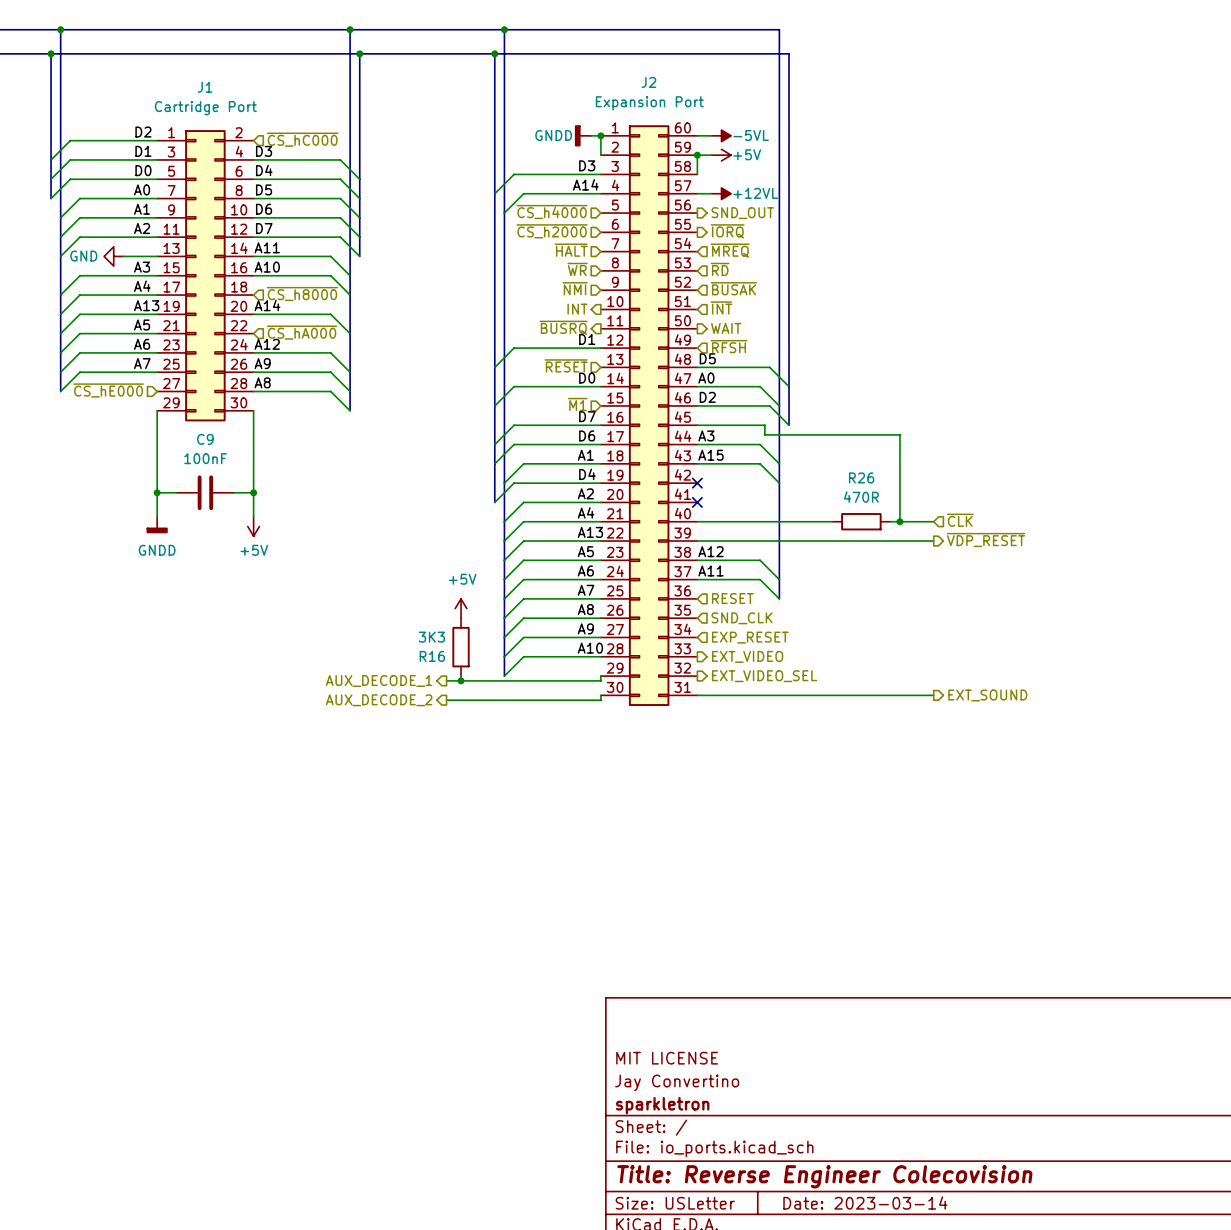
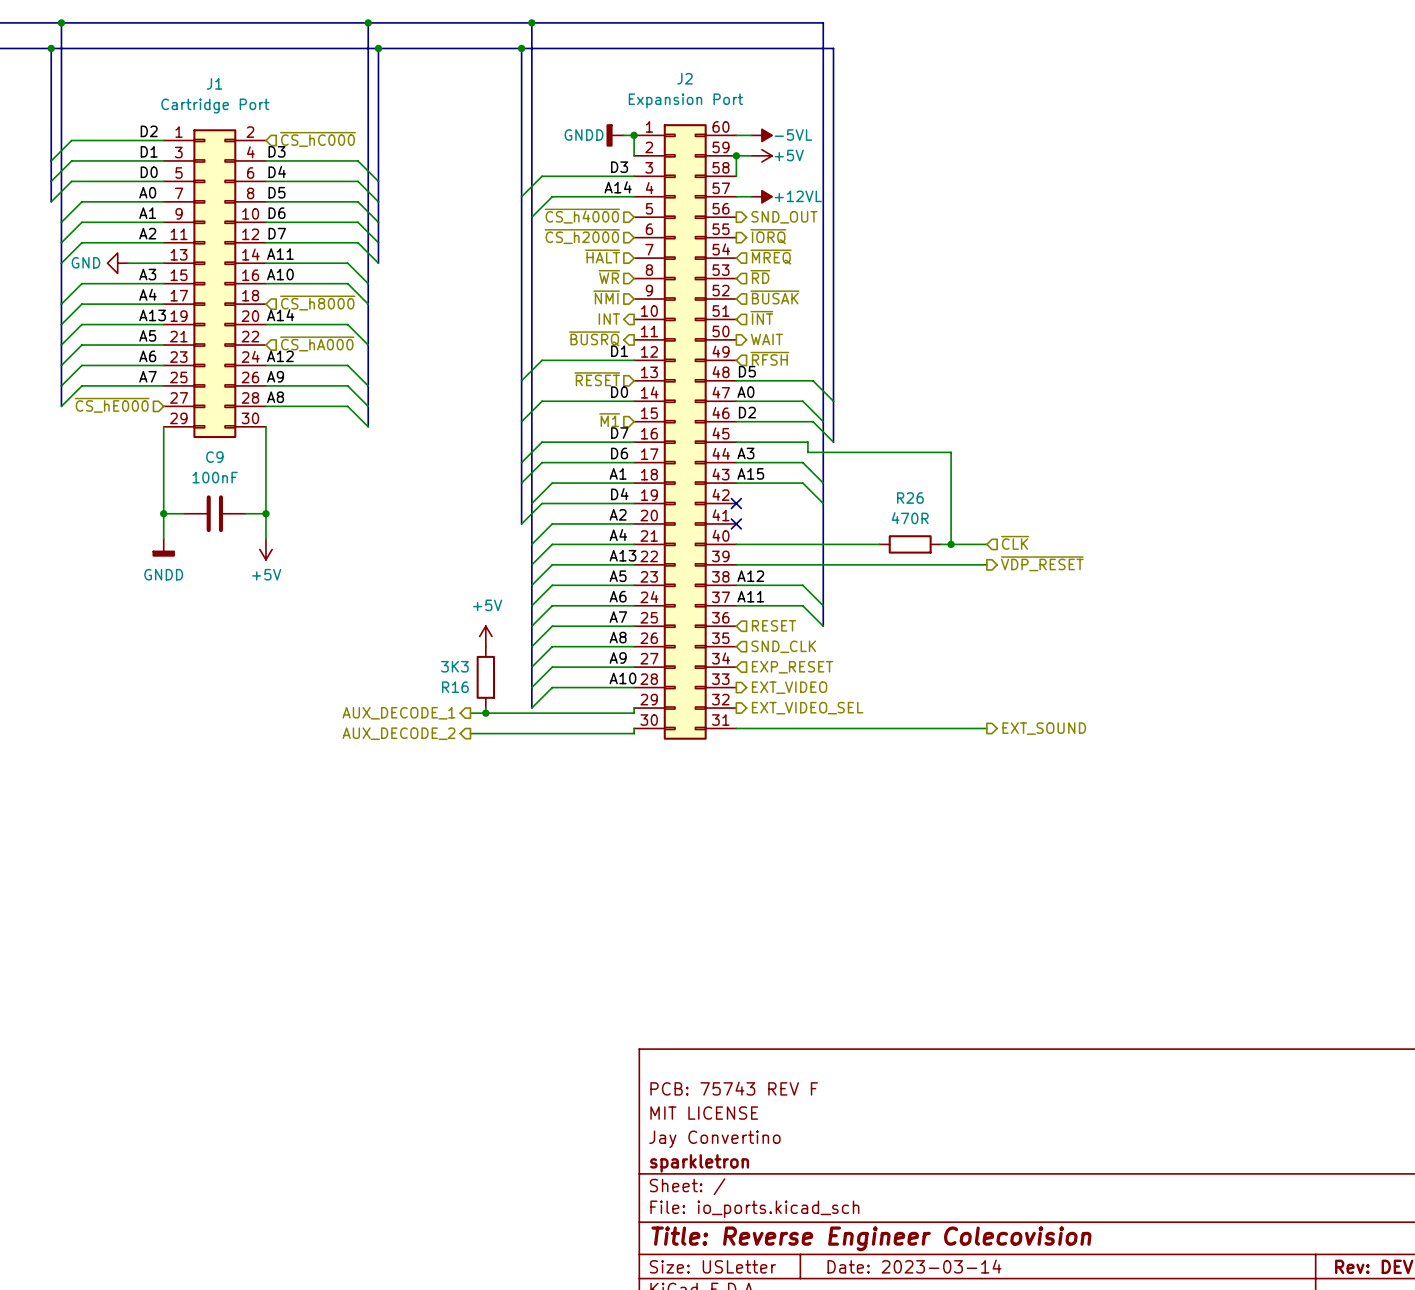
title block: none -> PCB: 75743 REV F (734, 1088)

